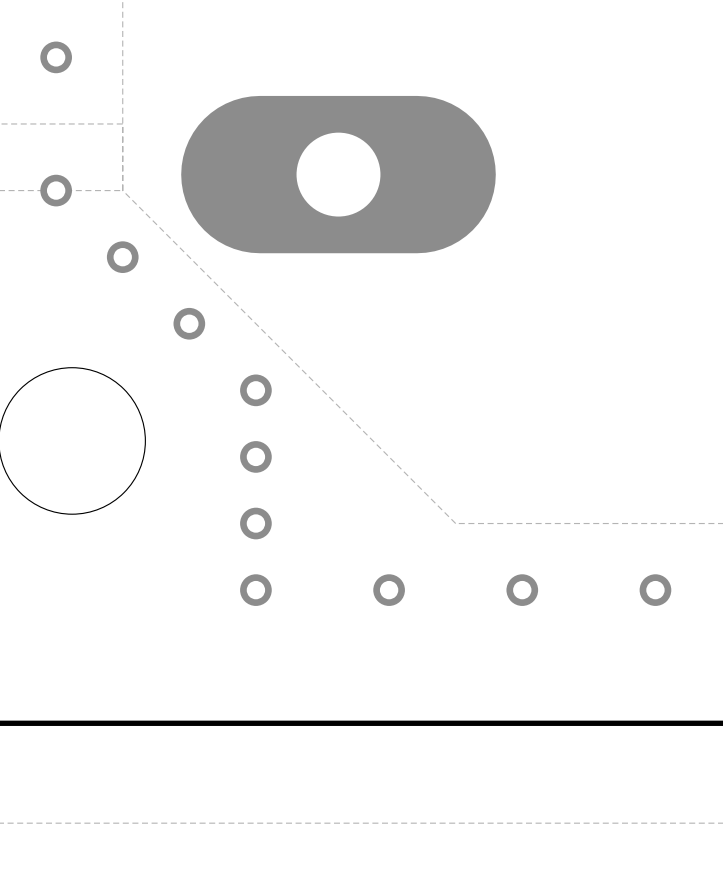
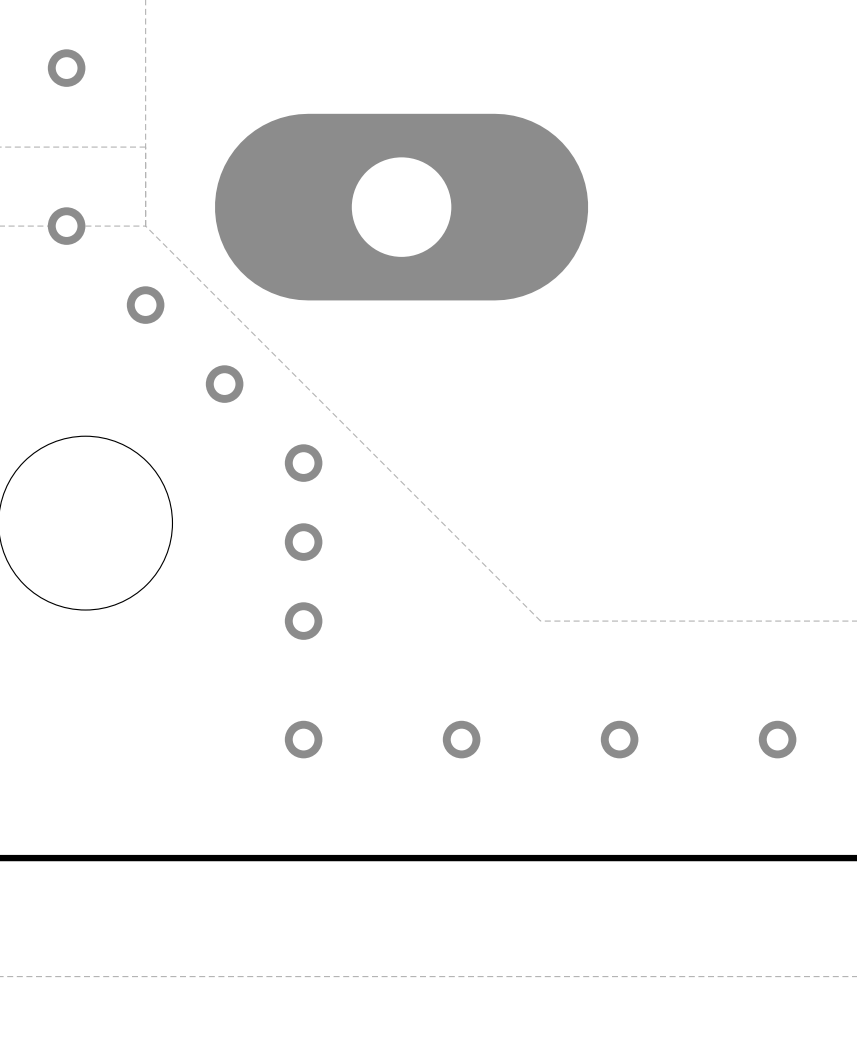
via position: (255, 590) -> (303, 739)
via position: (389, 590) -> (461, 739)
via position: (522, 590) -> (619, 739)
via position: (655, 590) -> (777, 739)

